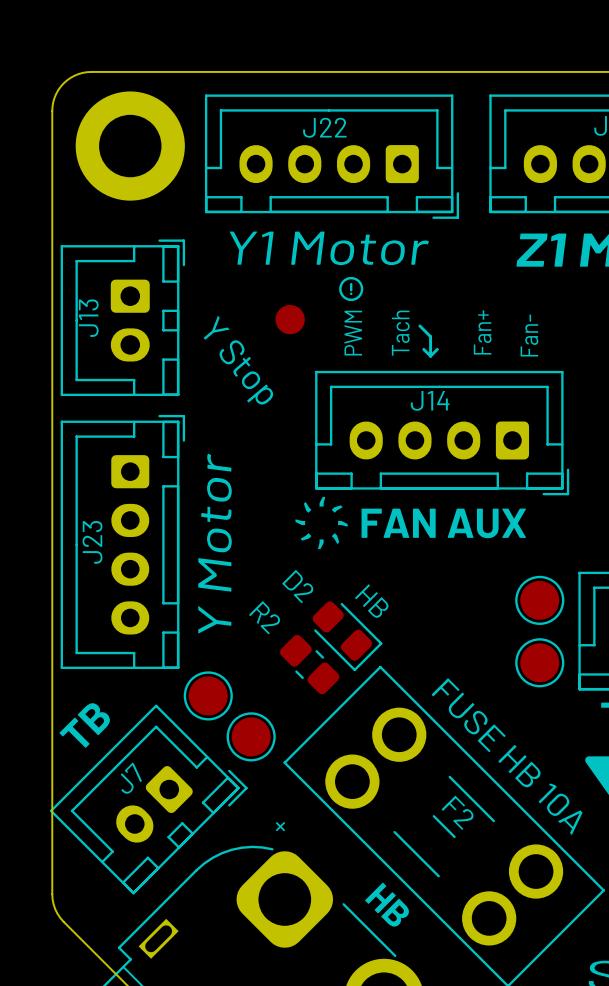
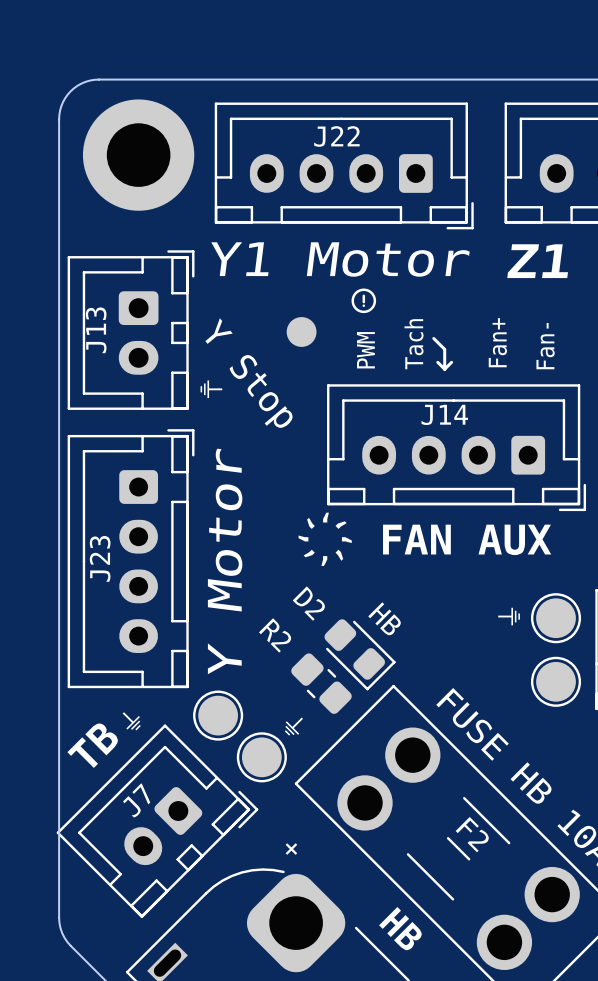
text: none -> ⏚ (211, 389)
text: none -> ⏚ (509, 616)
text: none -> ⏚ (131, 721)
text: none -> ⏚ (293, 726)

